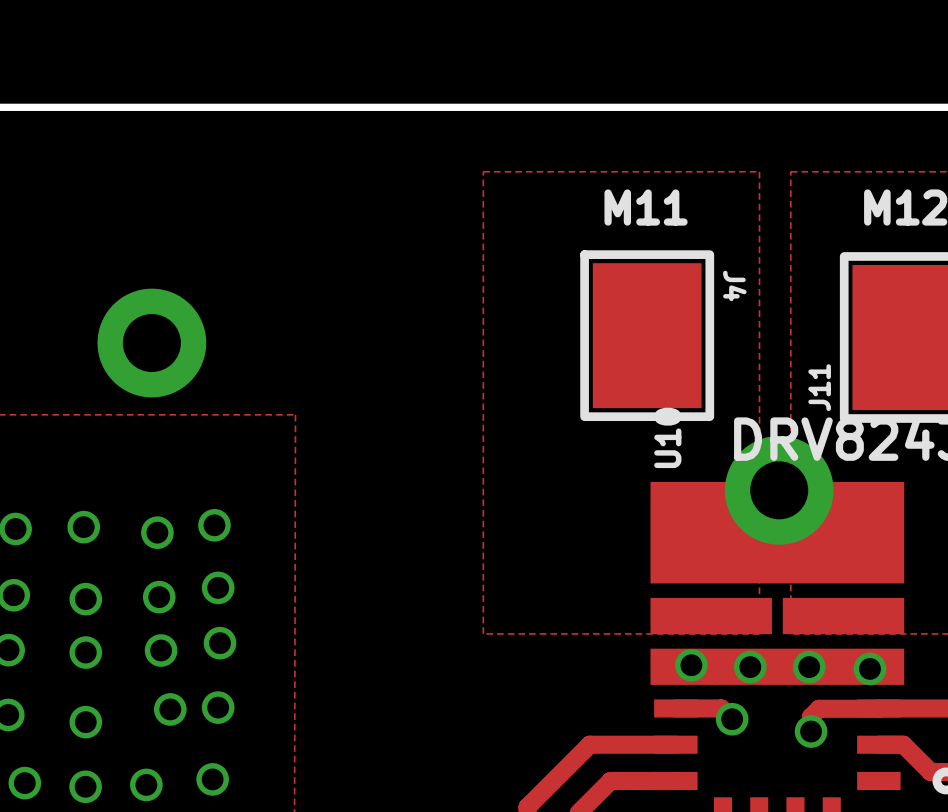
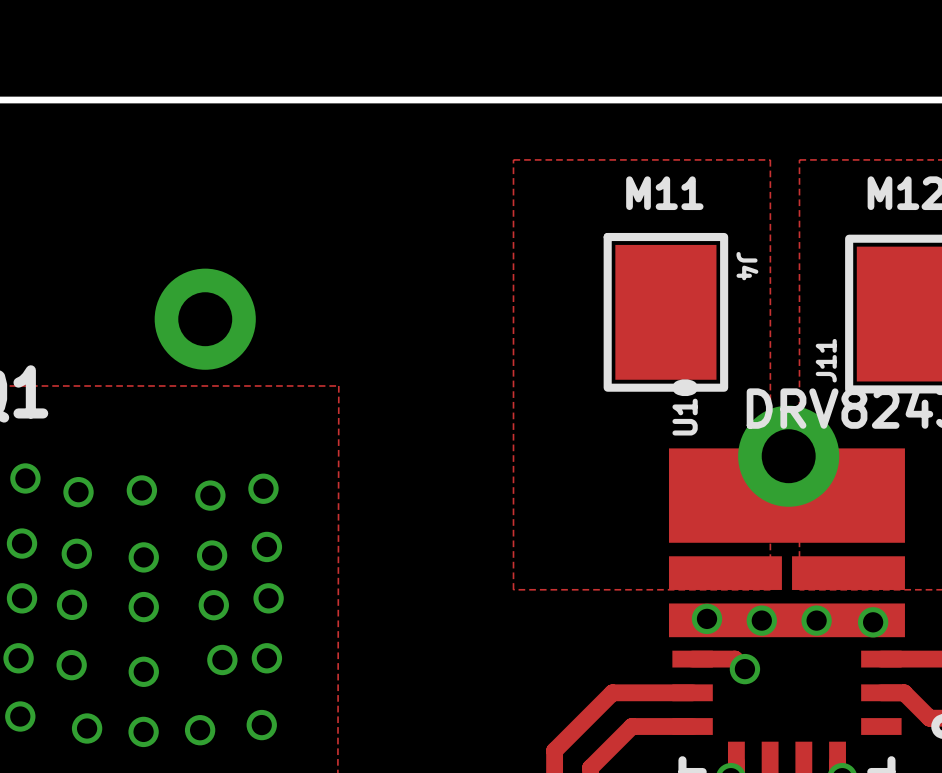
track: (878, 708) (819, 708) (811, 716) (811, 731) -> none
via: (811, 731) -> none

